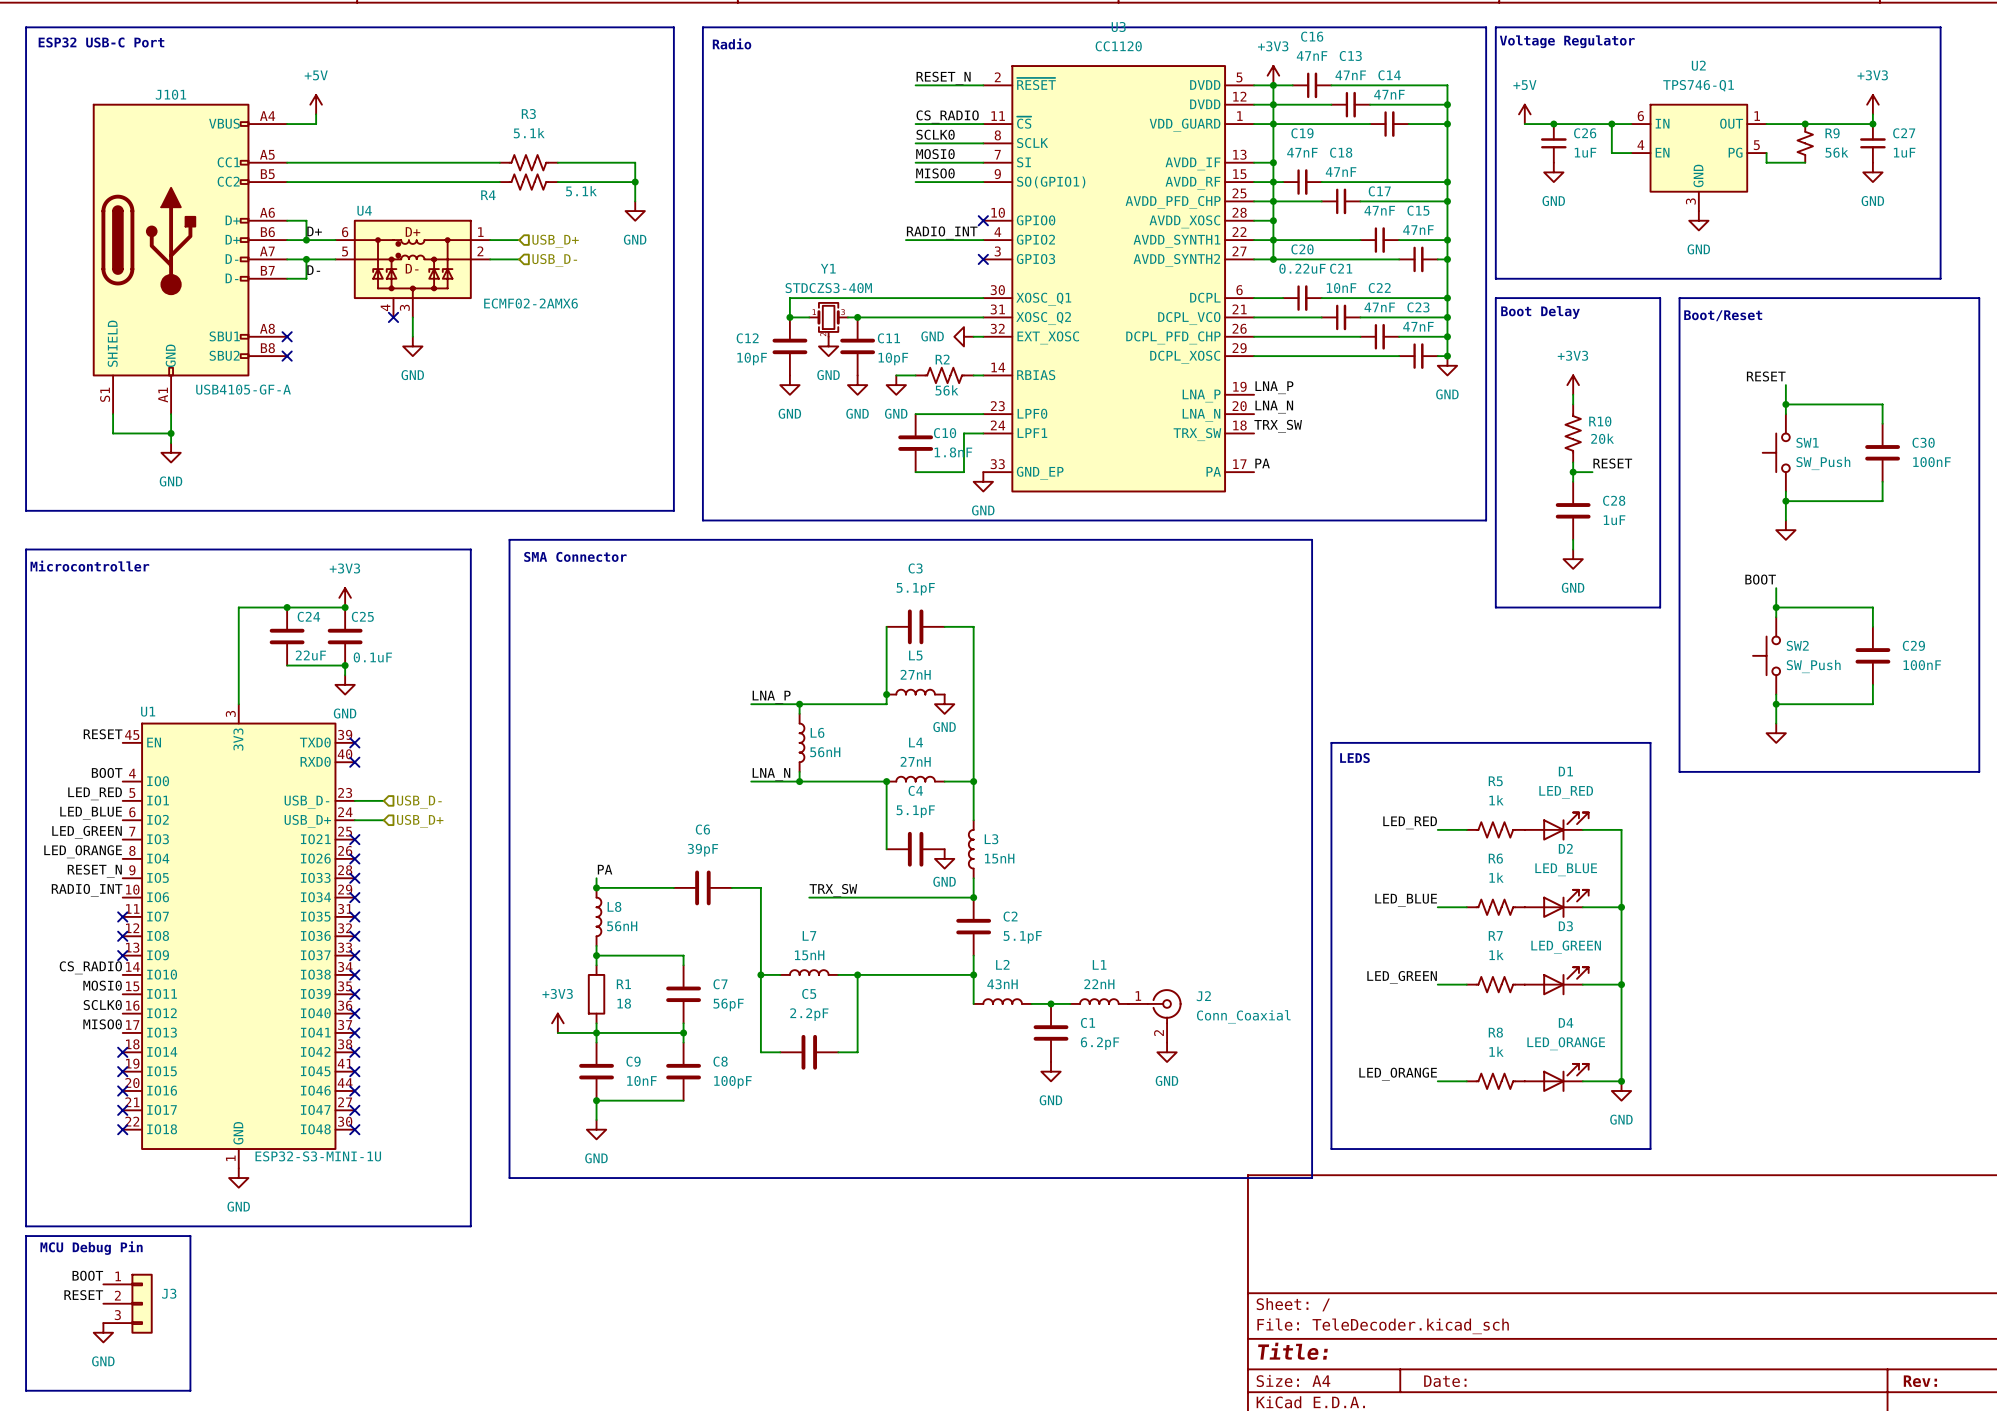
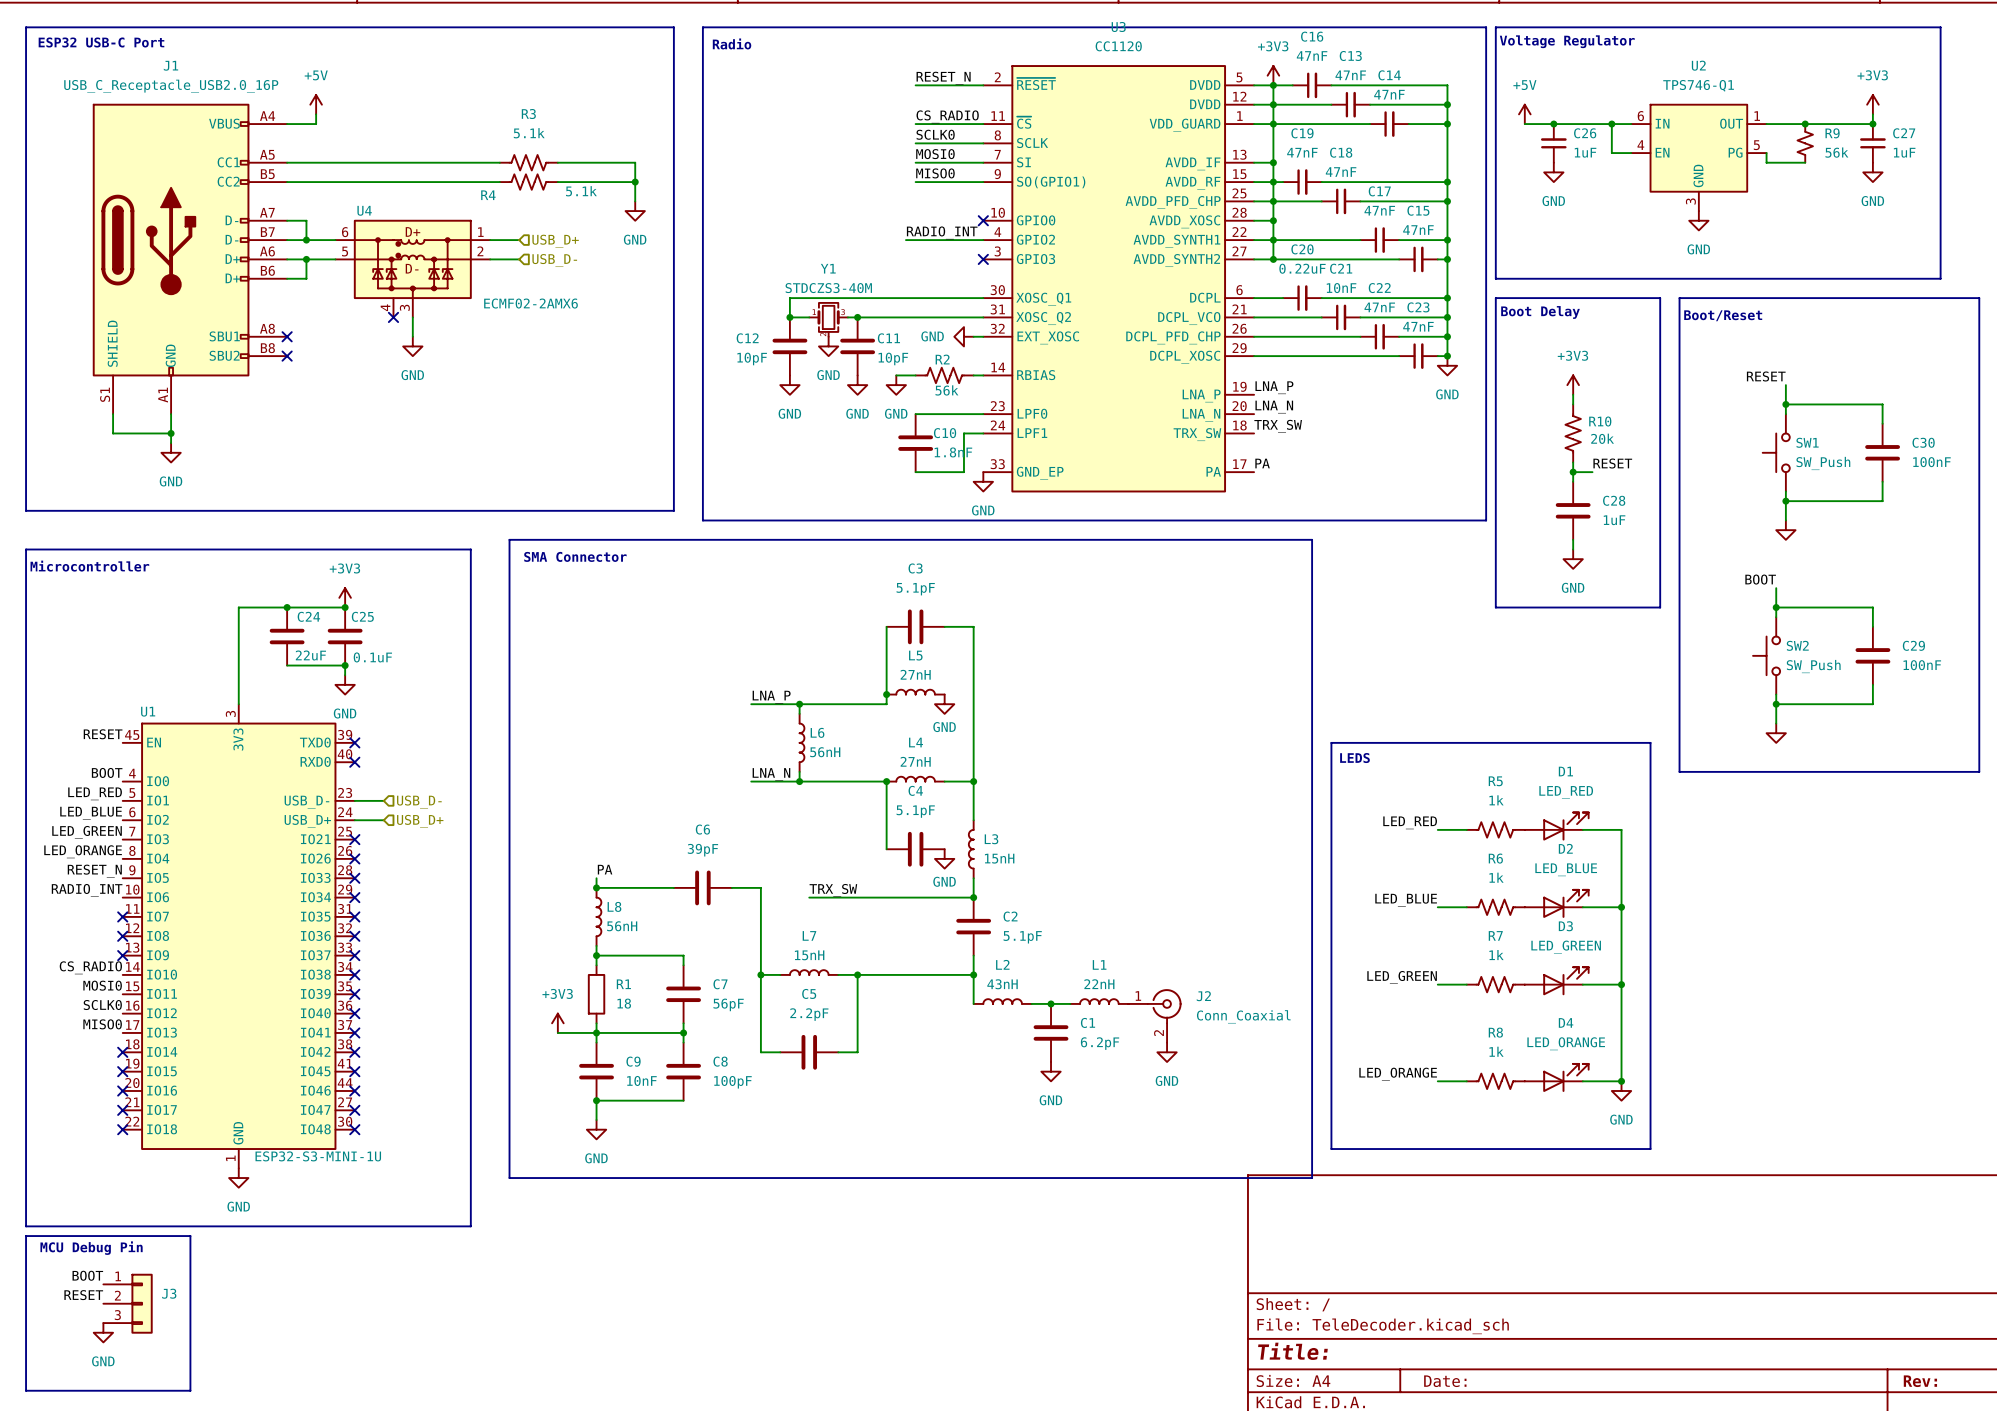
J101 name: J101 (170, 94) -> J1 (170, 65)
J101 pin number: A6 (267, 212) -> A7 (267, 212)
J101 pin name: D+ (232, 220) -> D- (232, 220)
label: D+ (314, 231) -> none
J101 pin number: B6 (267, 232) -> B7 (267, 232)
J101 pin name: D+ (232, 239) -> D- (232, 239)
J101 pin number: A7 (267, 251) -> A6 (267, 251)
J101 pin name: D- (232, 259) -> D+ (232, 259)
J101 pin number: B7 (267, 270) -> B6 (267, 270)
label: D- (313, 270) -> none
J101 pin name: D- (232, 278) -> D+ (232, 278)
J101 value: USB4105-GF-A (243, 389) -> USB_C_Receptacle_USB2.0_16P (171, 86)

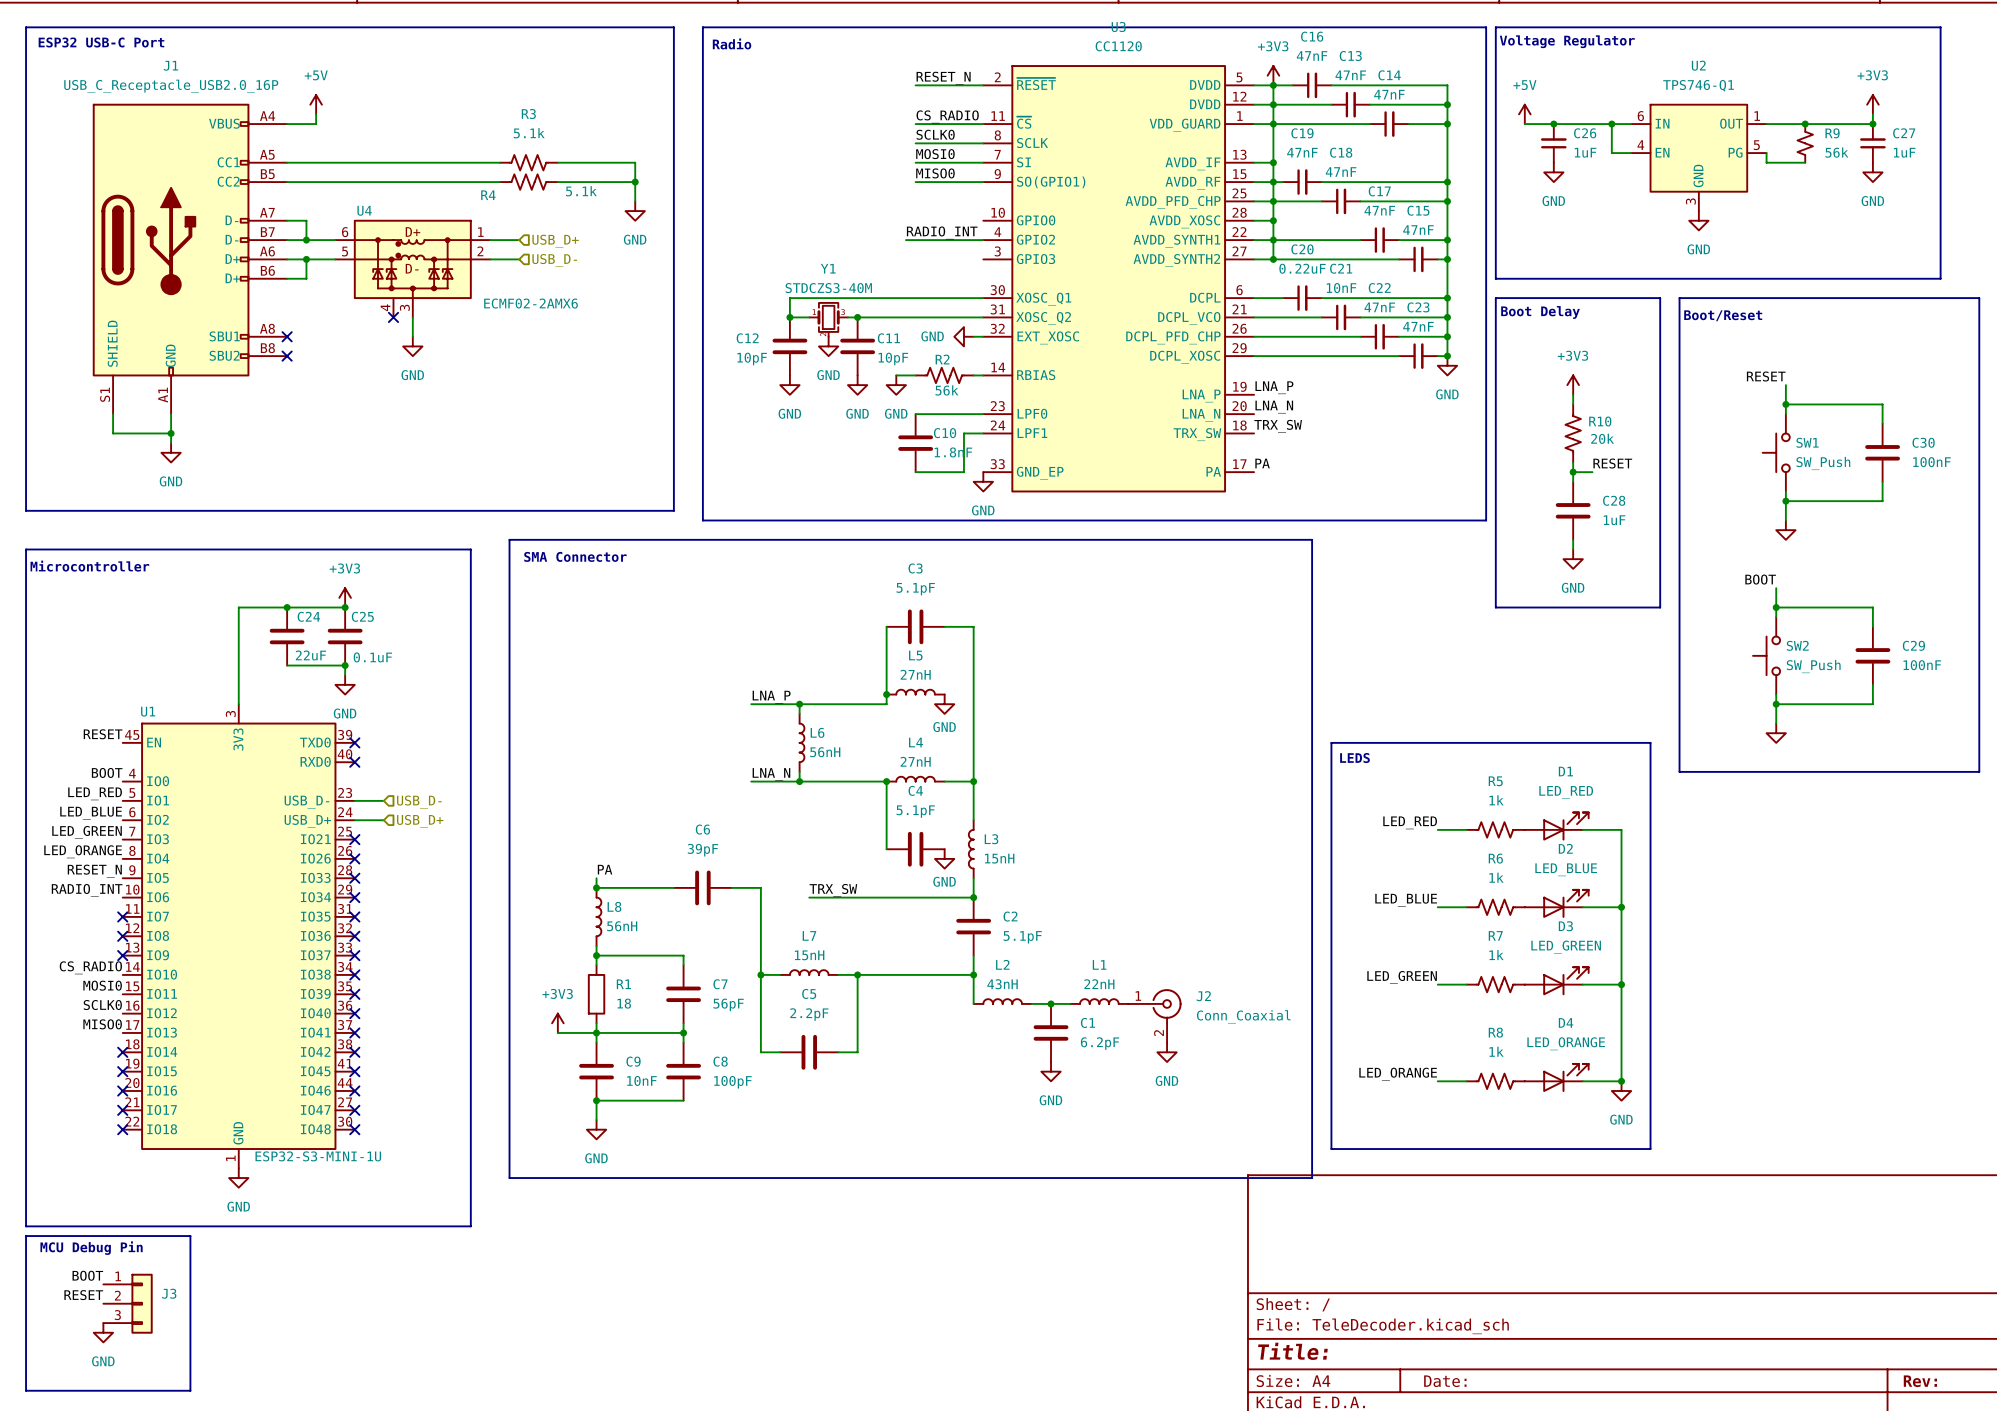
no-connect mark: (983, 220) -> none
no-connect mark: (983, 259) -> none

